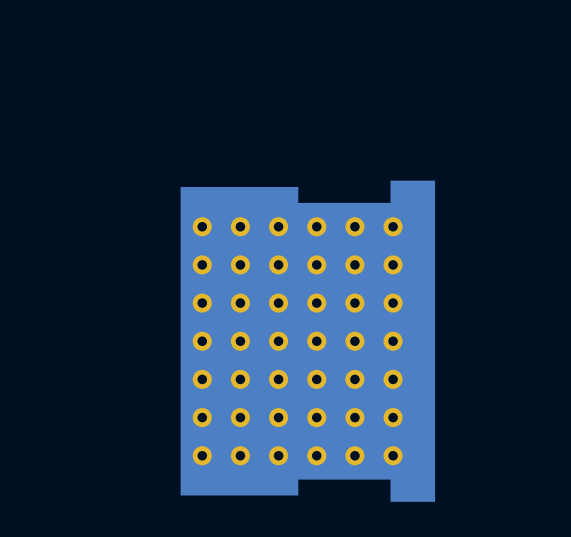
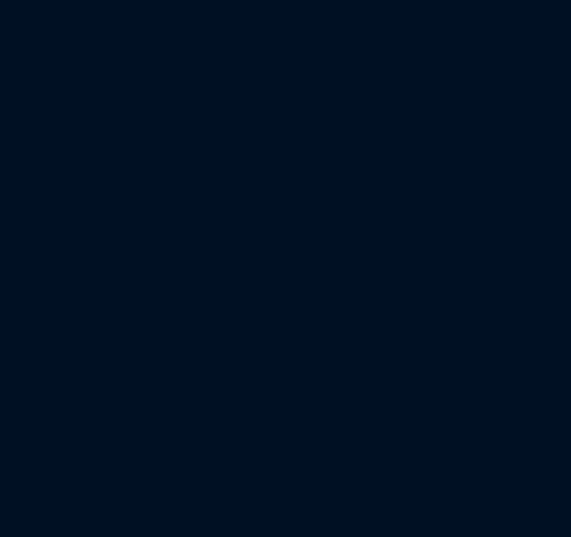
part: (307, 341) -> none

